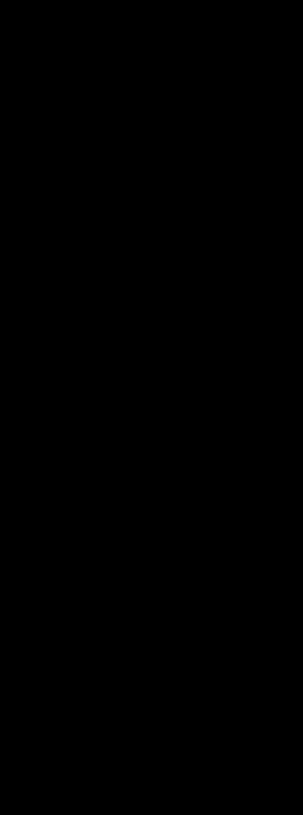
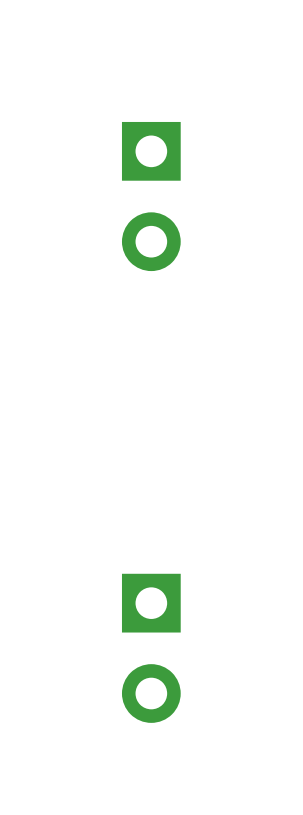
part: none -> (151, 196)
part: none -> (151, 648)

